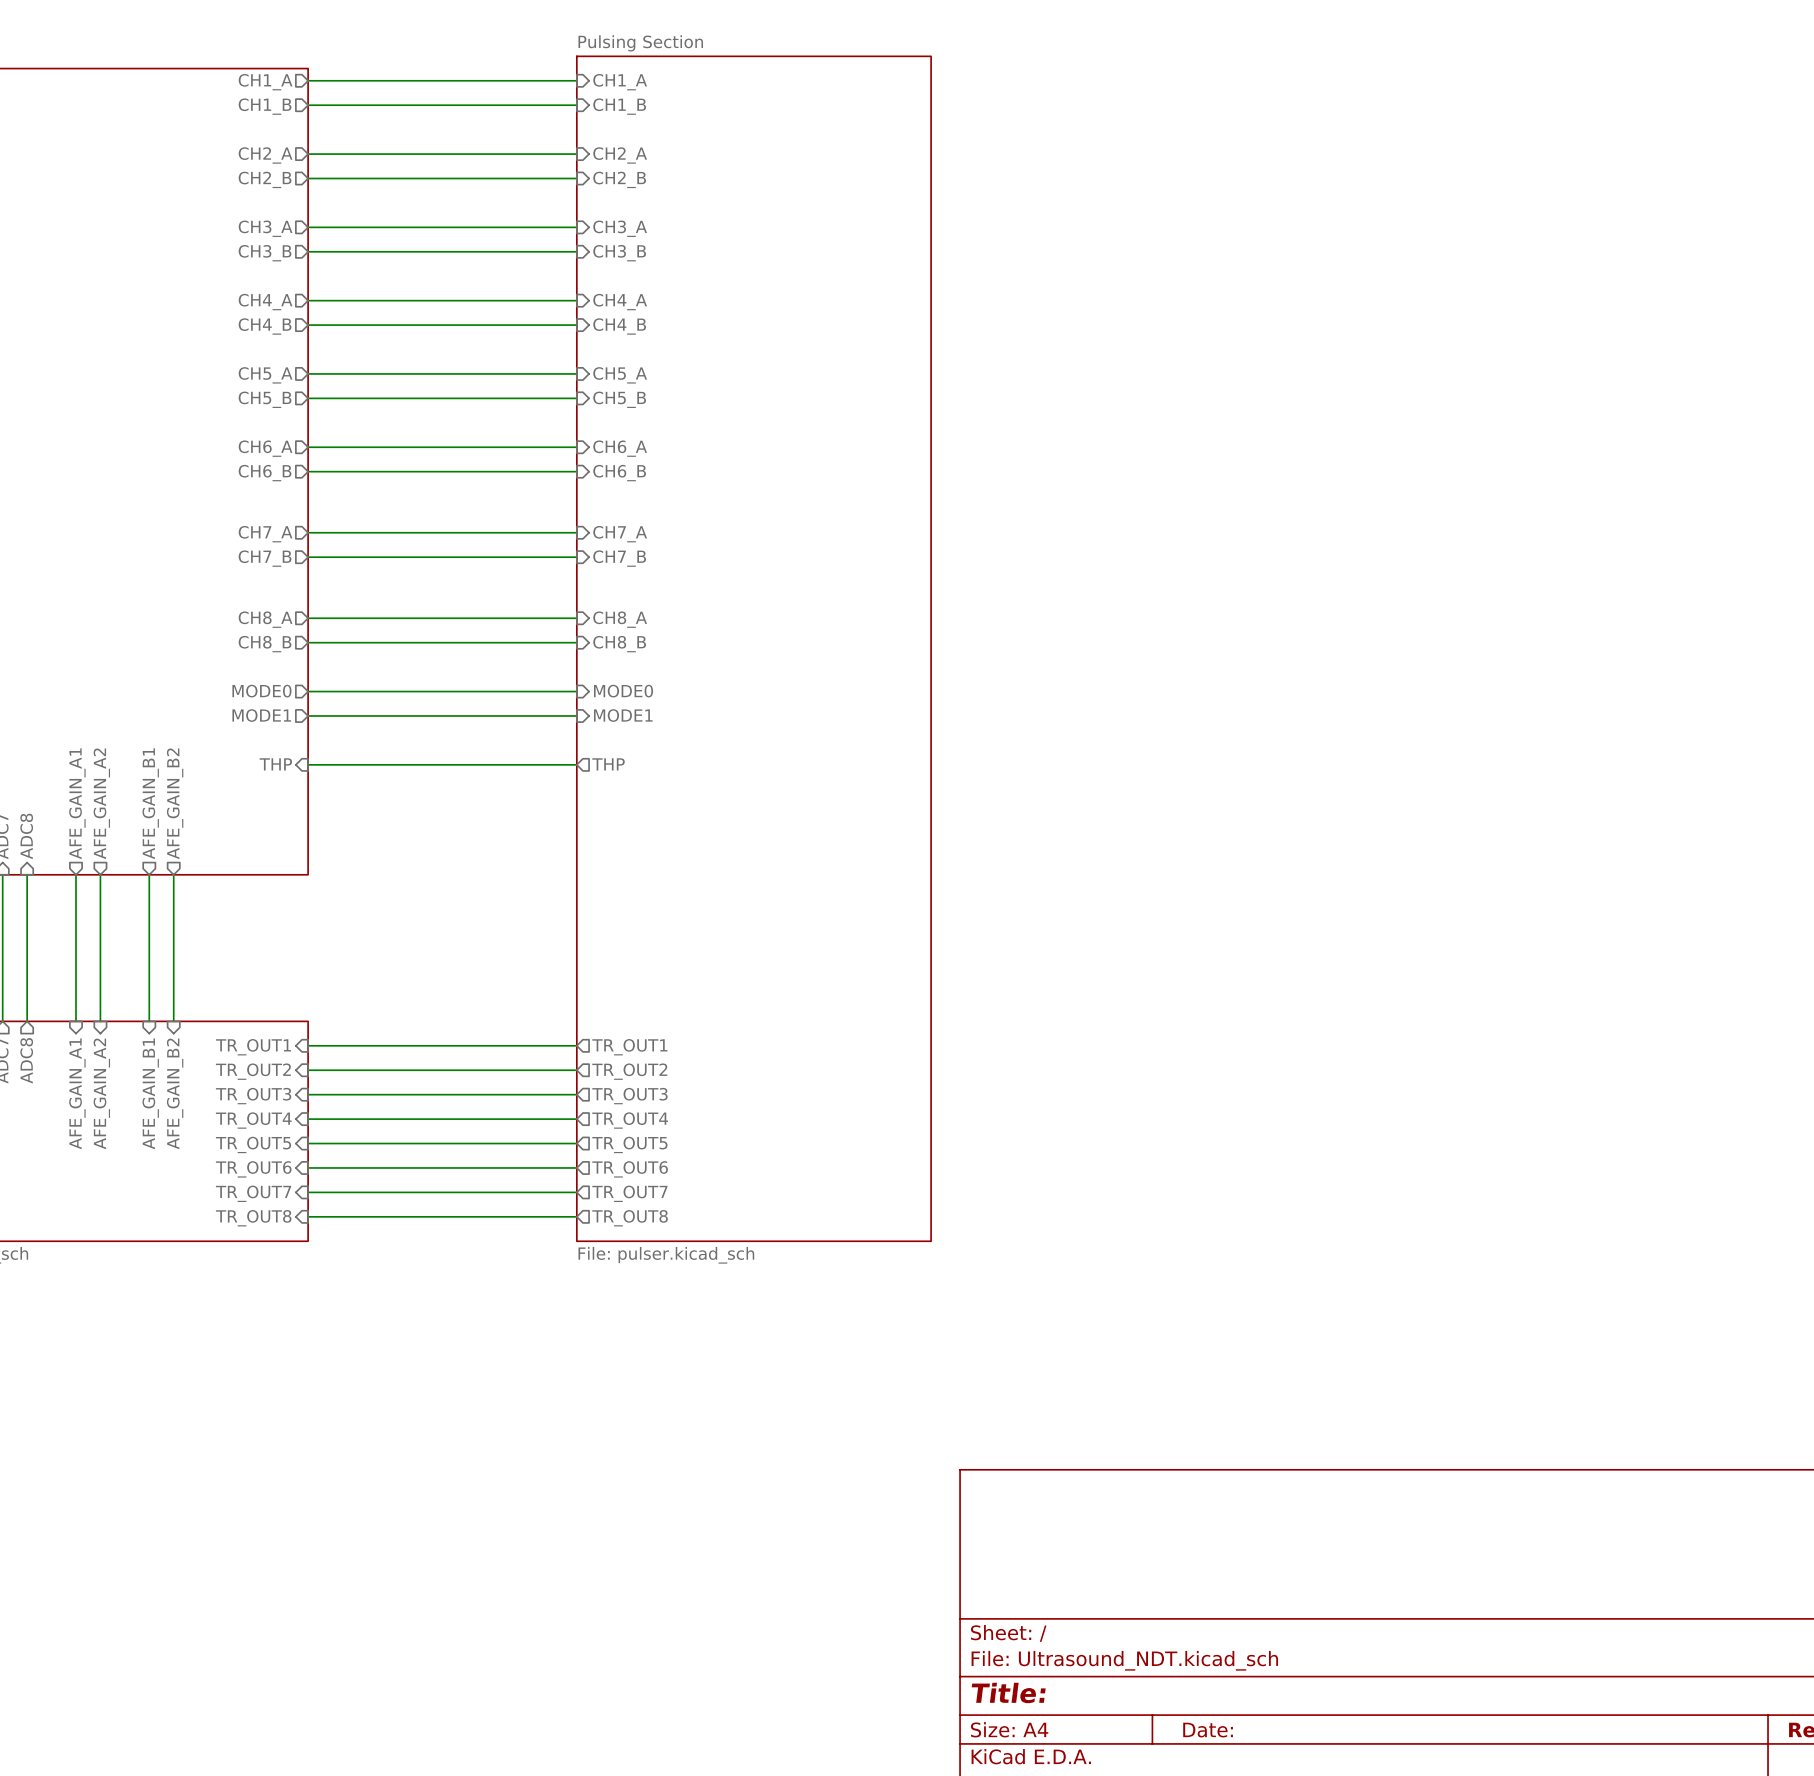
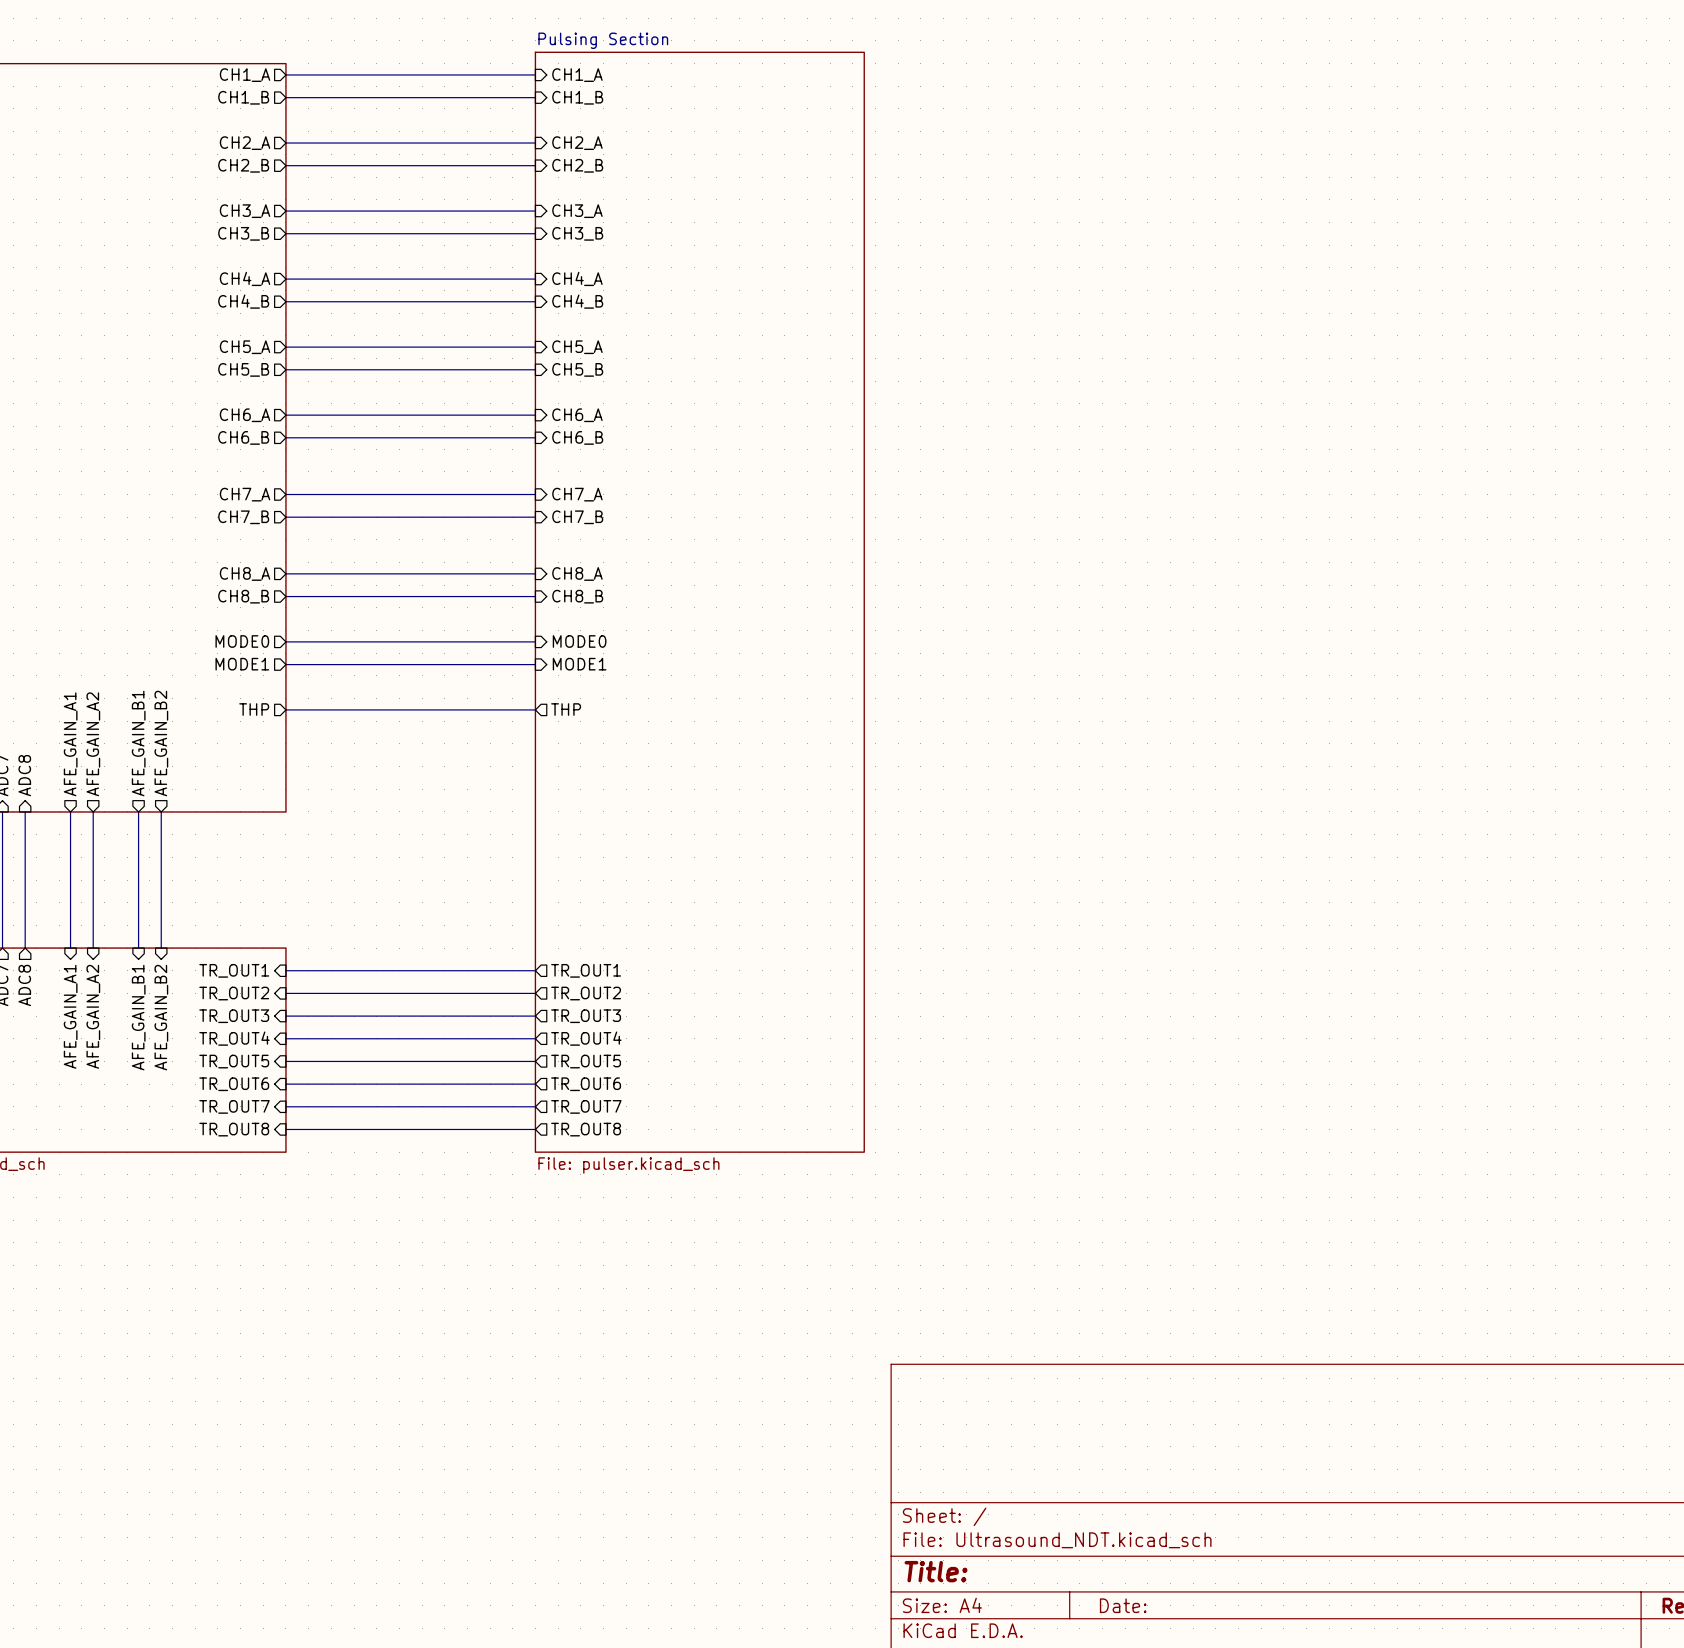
sheet pin shape: input (275, 764) -> output (254, 709)

